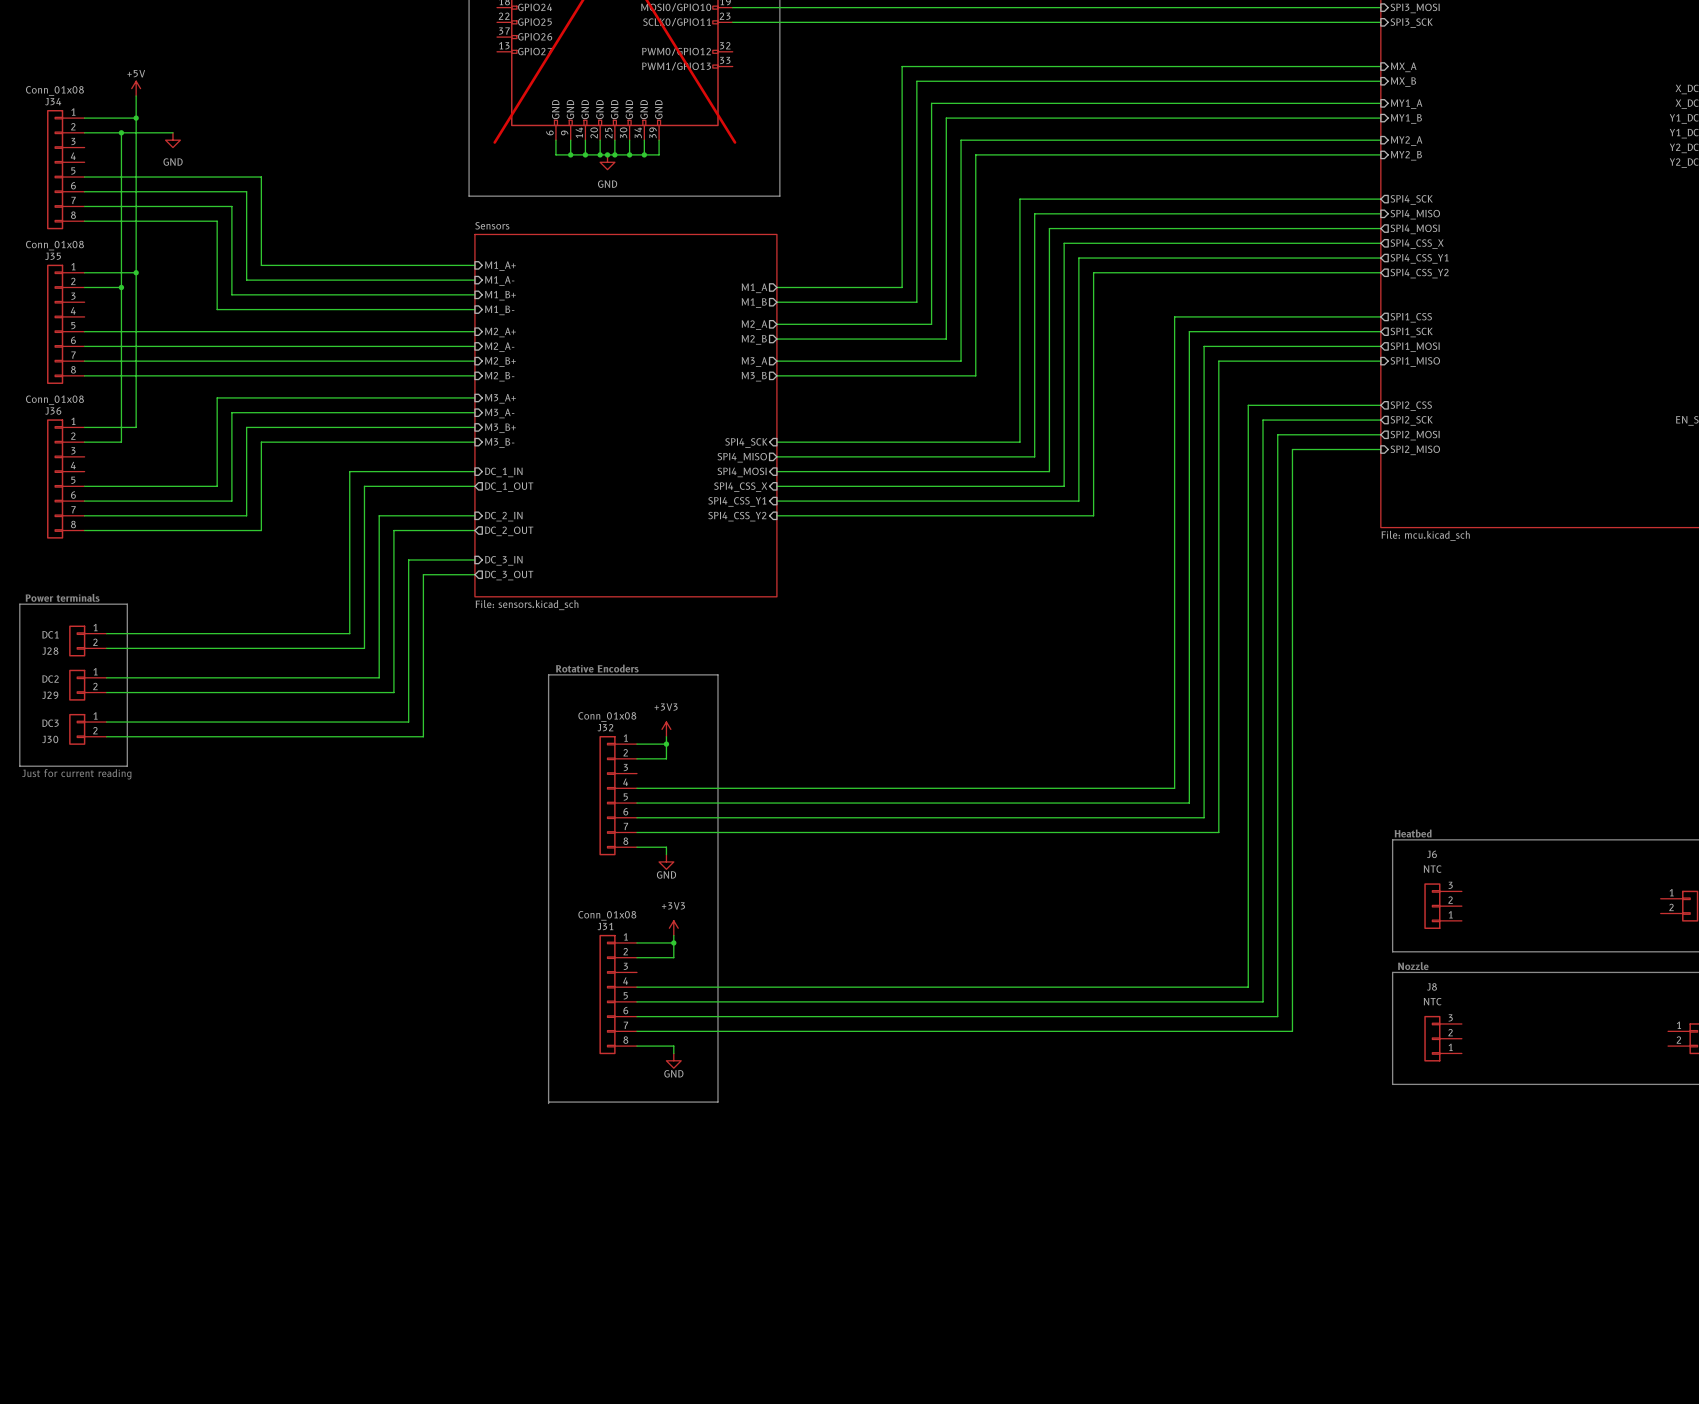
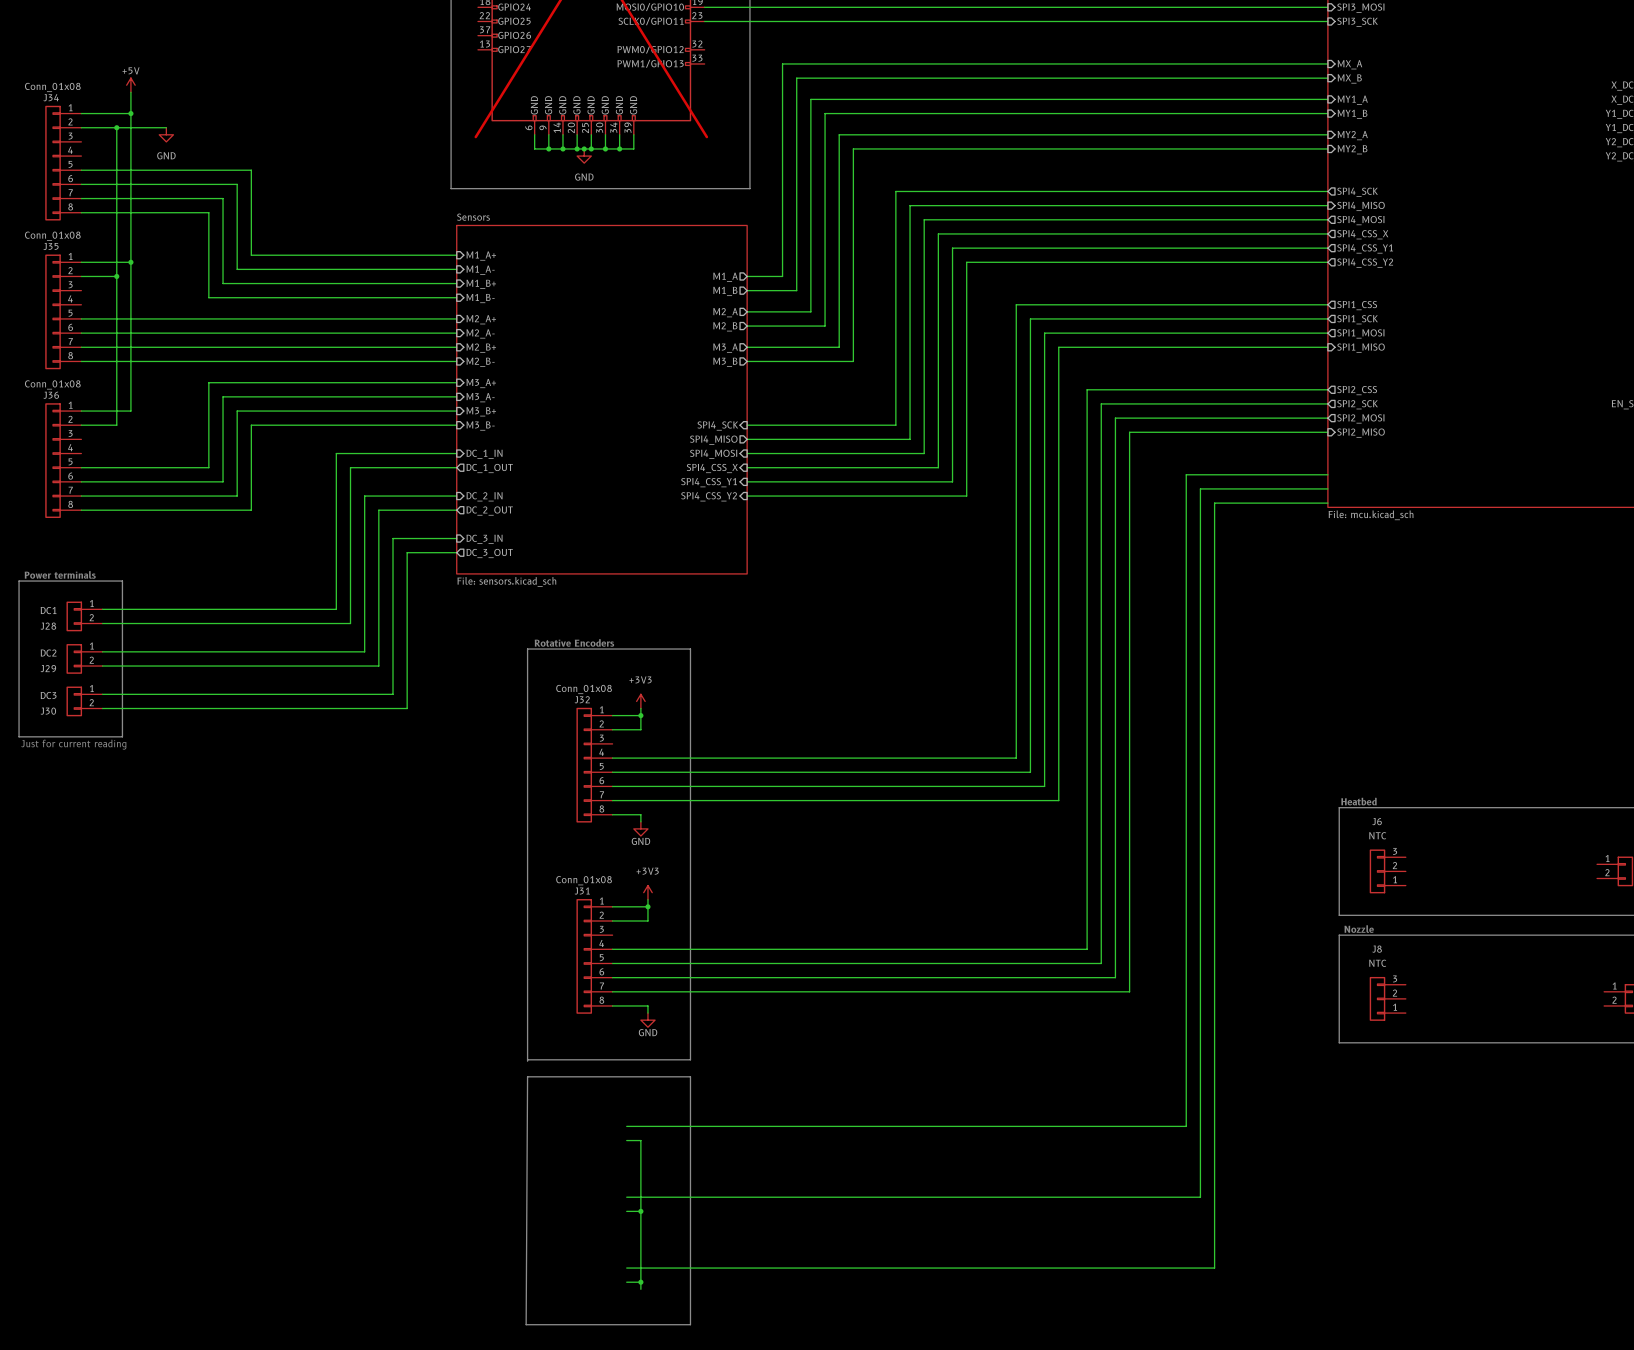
wire: (902, 66) (902, 287) (813, 287) -> (867, 63) (782, 63) (782, 276)
wire: (916, 81) (916, 302) (828, 302) -> (881, 78) (796, 78) (796, 290)
wire: (931, 103) (931, 199) -> (980, 191) (895, 191)
wire: none -> (895, 99) (810, 99) (810, 311)
wire: (946, 118) (946, 213) -> (995, 205) (910, 205)
wire: none -> (910, 113) (825, 113) (825, 326)
wire: (961, 140) (961, 228) -> (1009, 219) (924, 219)
wire: none -> (924, 134) (839, 134) (839, 347)
wire: (975, 154) (975, 243) -> (1023, 233) (938, 233)
wire: none -> (938, 148) (853, 148) (853, 361)
wire: (1019, 199) (1019, 442) (931, 442) -> none
wire: (1034, 213) (1034, 456) (946, 456) -> none
wire: (1049, 228) (1049, 471) (961, 471) -> none
wire: (1064, 243) (1064, 486) (975, 486) -> none
wire: (1078, 258) (1078, 501) (990, 501) -> (1037, 248) (952, 248) (952, 481)
wire: (1093, 272) (1093, 515) (1005, 515) -> (1051, 262) (966, 262) (966, 496)
wire: (1174, 316) (1174, 449) -> (1242, 432) (1129, 432)
wire: none -> (1129, 304) (1016, 304) (1016, 758)
wire: (843, 324) (931, 324) -> (895, 425) (895, 311)
wire: (1189, 331) (1189, 803) (1071, 803) -> (1143, 318) (1030, 318) (1030, 772)
wire: (857, 339) (946, 339) -> (910, 439) (910, 326)
wire: (1204, 346) (1204, 817) (1086, 817) -> (1157, 333) (1044, 333) (1044, 786)
wire: (872, 361) (961, 361) -> (924, 453) (924, 347)
wire: (1218, 361) (1218, 832) (1100, 832) -> (1172, 347) (1058, 347) (1058, 800)
wire: (887, 375) (975, 375) -> (938, 467) (938, 361)
wire: (1248, 405) (1248, 508) -> (1327, 488) (1200, 488)
wire: none -> (1200, 389) (1087, 389) (1087, 949)
wire: (1263, 420) (1263, 523) -> (1327, 503) (1214, 503)
wire: (1277, 434) (1277, 1016) (1159, 1016) -> (1228, 418) (1115, 418) (1115, 977)
wire: (1292, 449) (1292, 1031) (1174, 1031) -> none
wire: none -> (1327, 474) (1186, 474) (1186, 1126) (626, 1126)
wire: (1056, 788) (1174, 788) -> (1129, 991) (1129, 758)
wire: (1130, 987) (1248, 987) -> (626, 1197) (1200, 1197) (1200, 949)
wire: (1145, 1001) (1263, 1001) -> (1101, 963) (1101, 403) (1214, 403)
wire: none -> (1214, 963) (1214, 1268) (626, 1268)
line: none -> (527, 1076) (690, 1076) (690, 1324) (526, 1324) (527, 1076)
wire: none -> (626, 1140) (640, 1140) (640, 1289)
wire: none -> (626, 1211) (640, 1211)
junction: none -> (640, 1211)
wire: none -> (626, 1282) (640, 1282)
junction: none -> (640, 1282)

